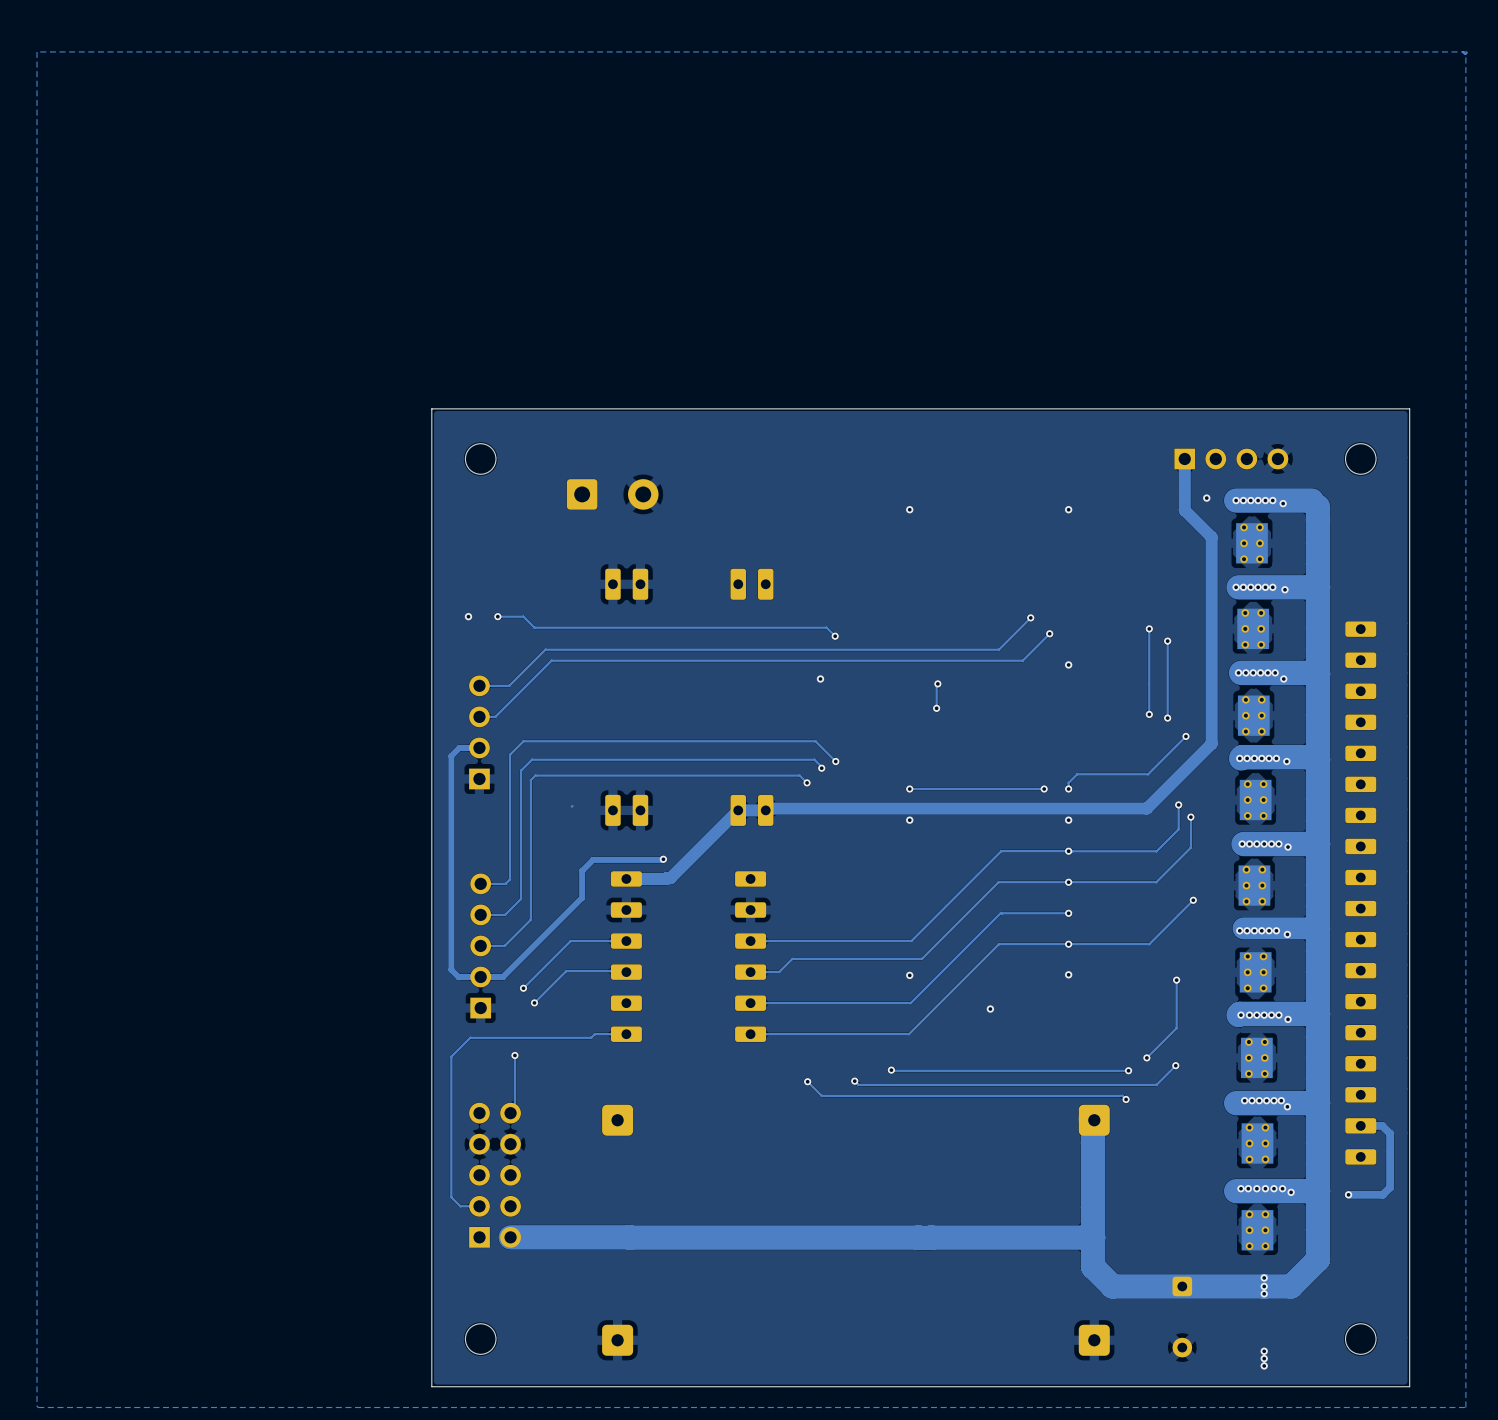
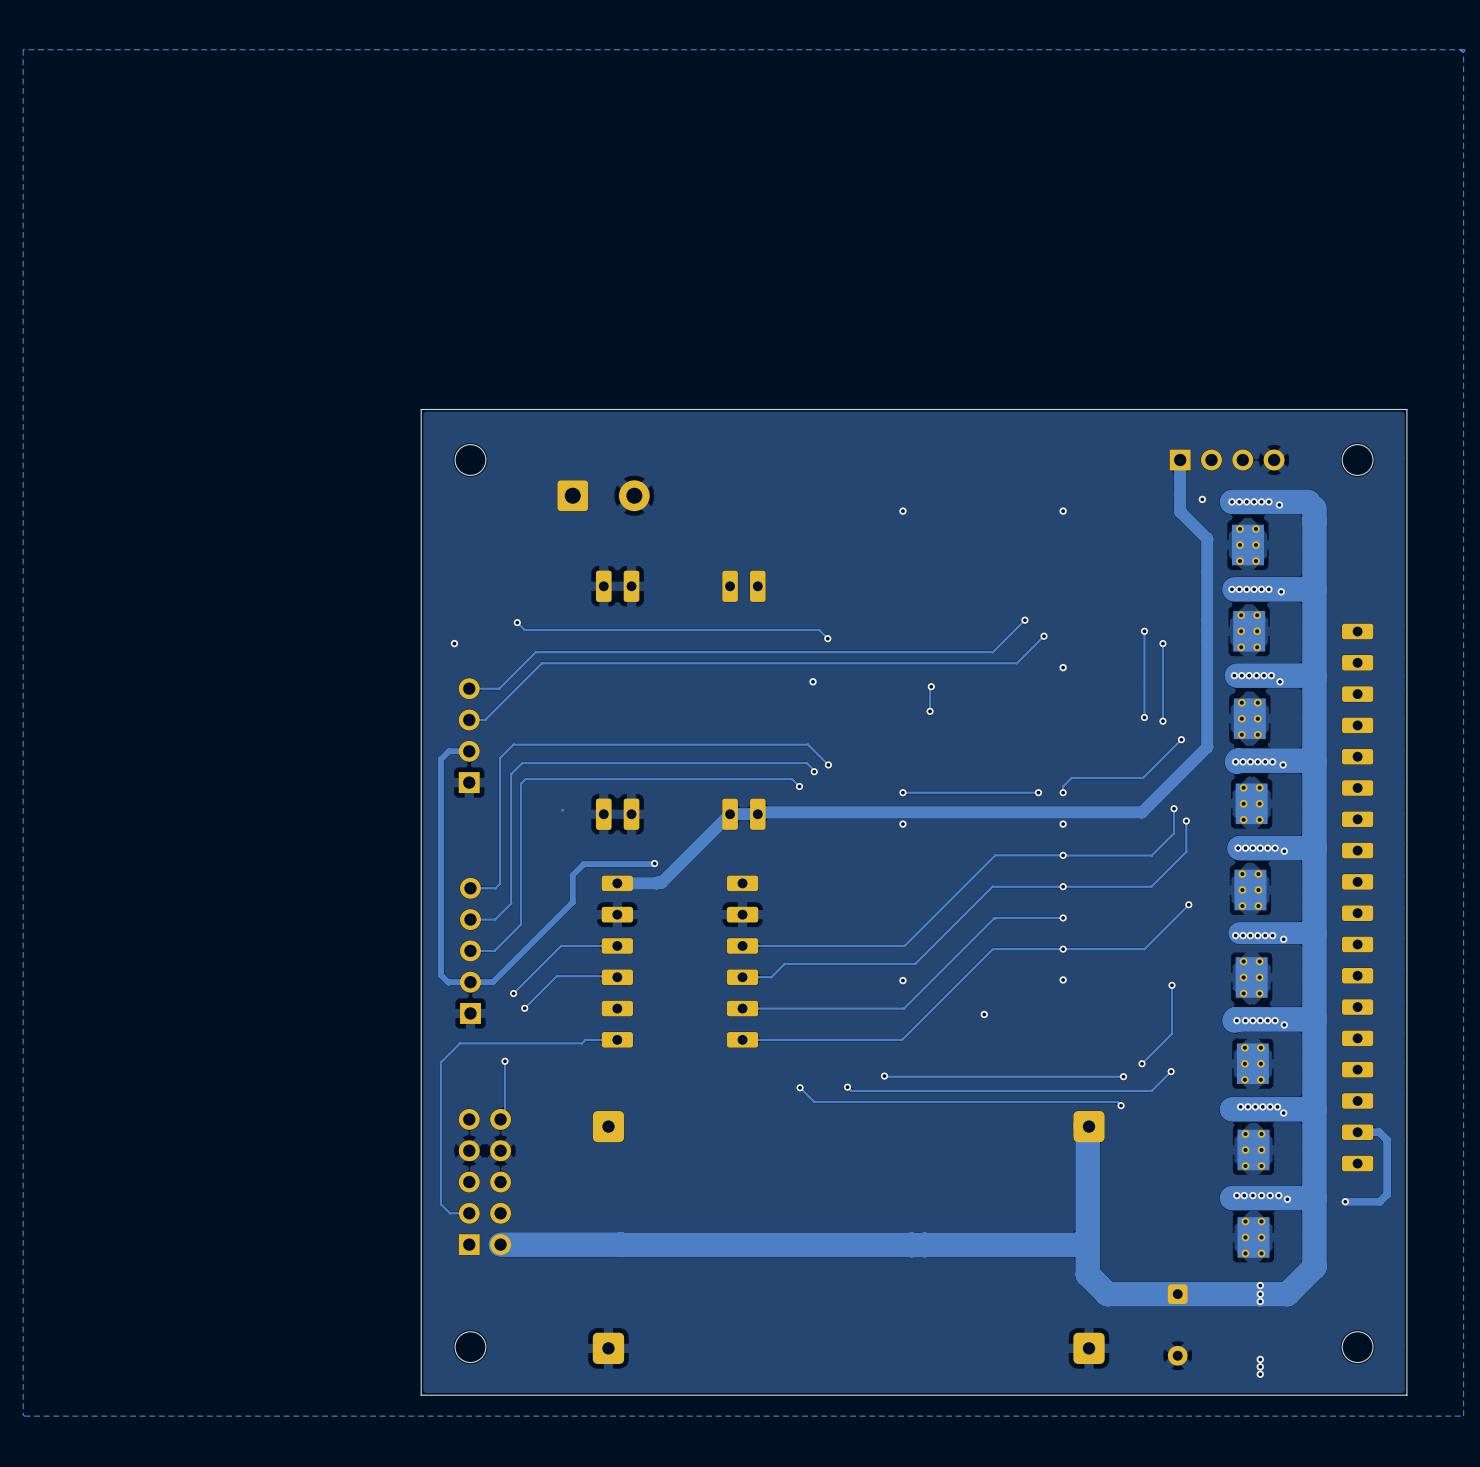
via: (468, 616) -> none
track: (497, 616) (523, 616) (527, 620) -> none
via: (497, 616) -> none
via: none -> (517, 622)
via: none -> (454, 643)

